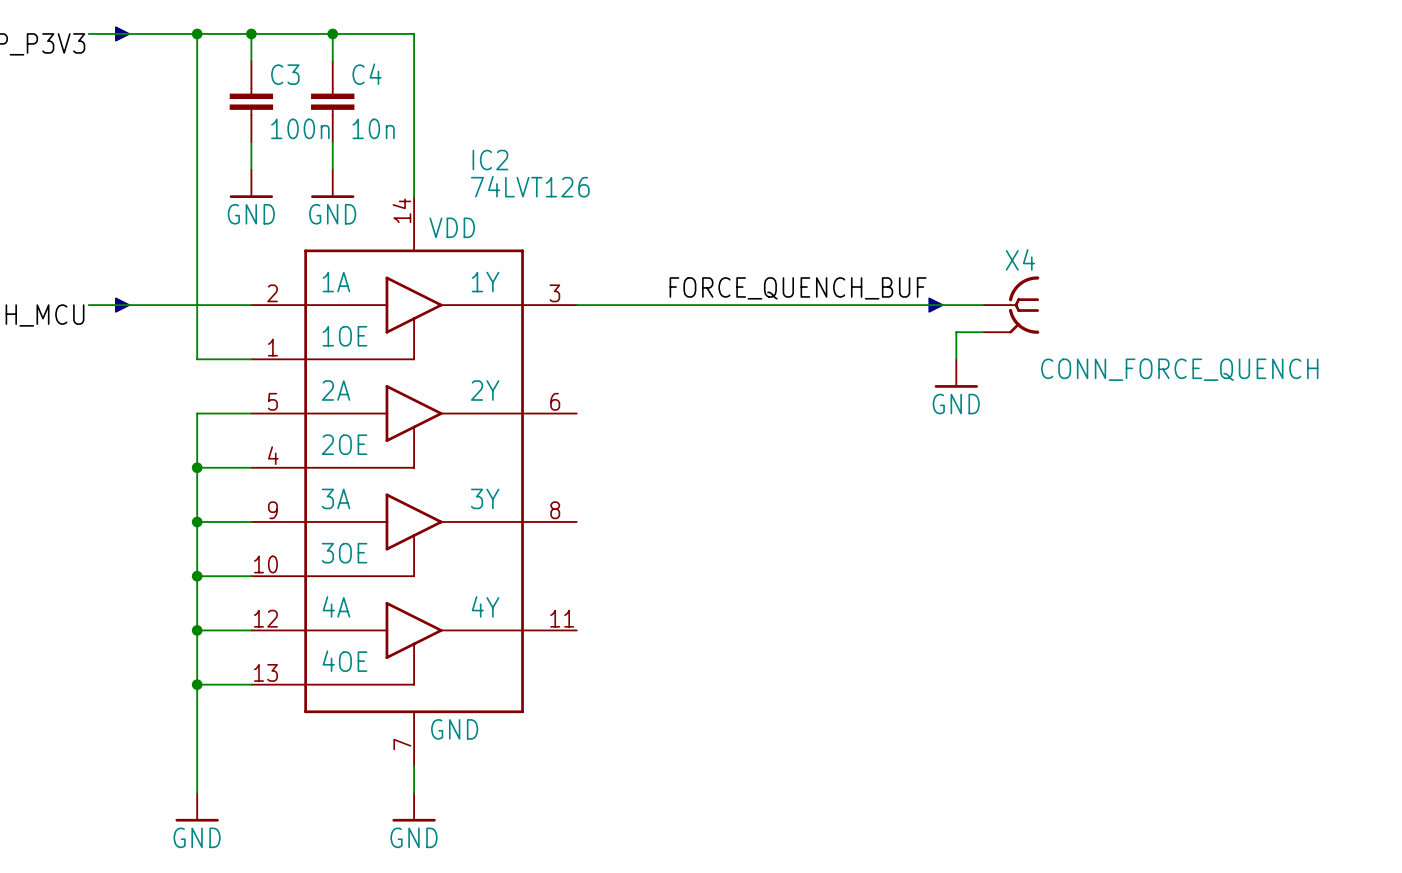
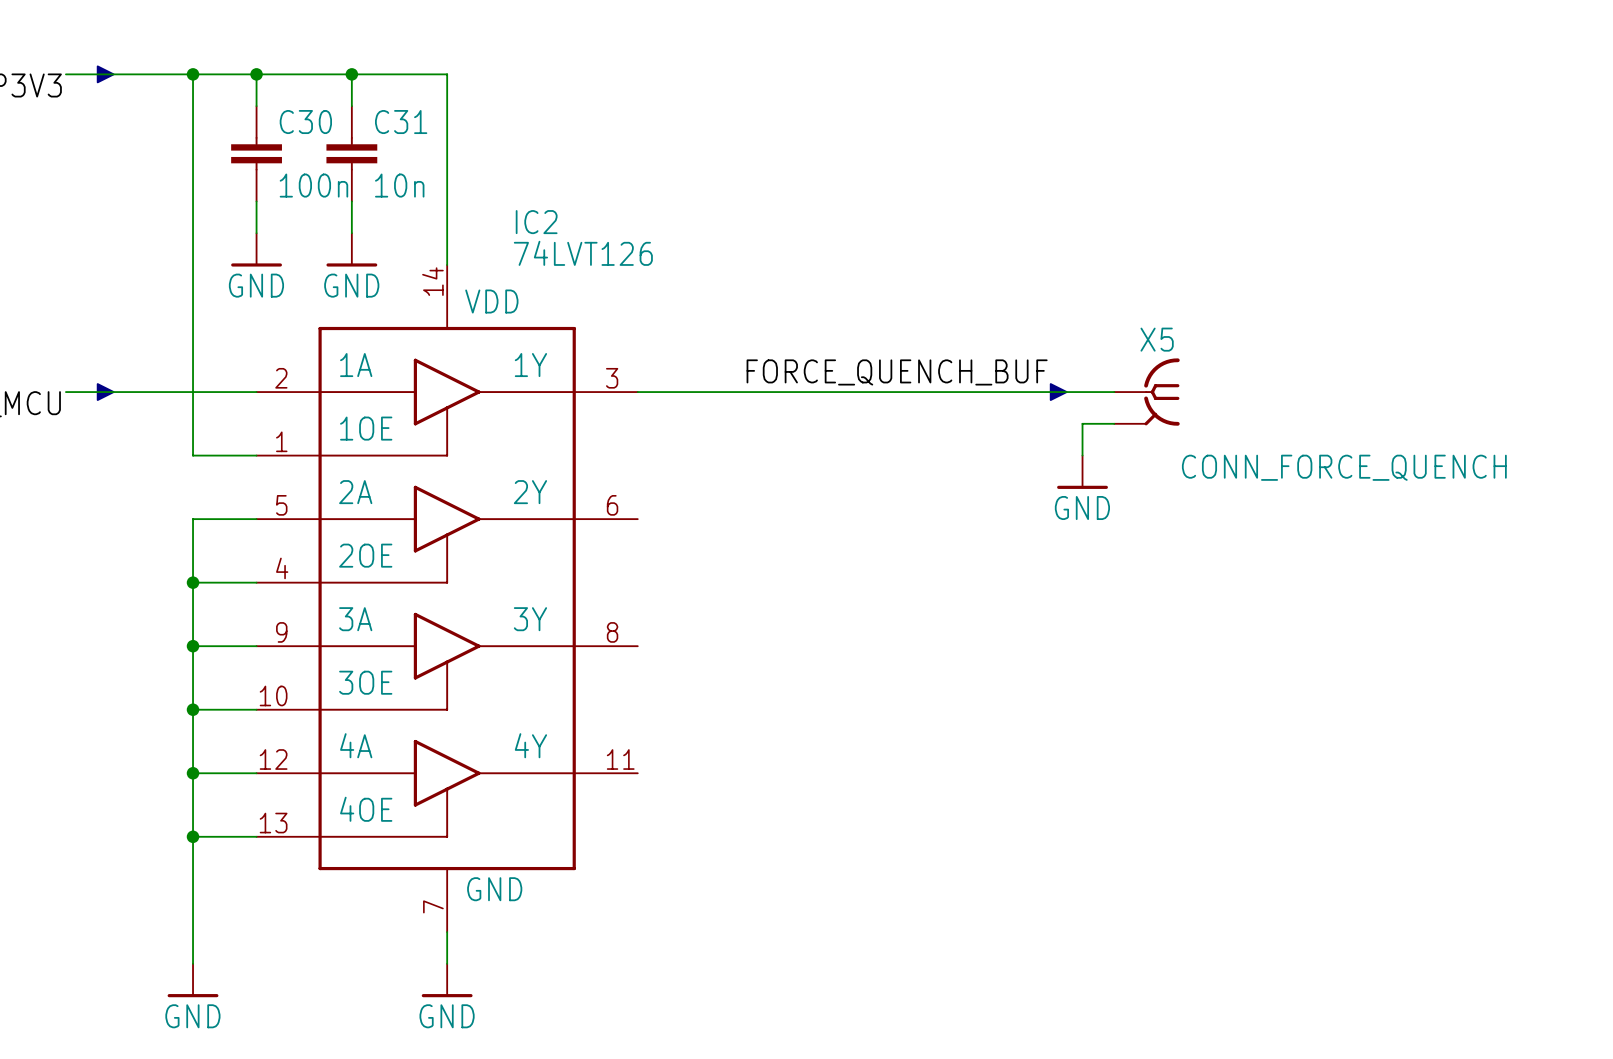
C3 name: C3 (285, 74) -> C30 (305, 122)
C4 name: C4 (367, 74) -> C31 (401, 122)
X4 name: X4 (1020, 259) -> X5 (1157, 339)

